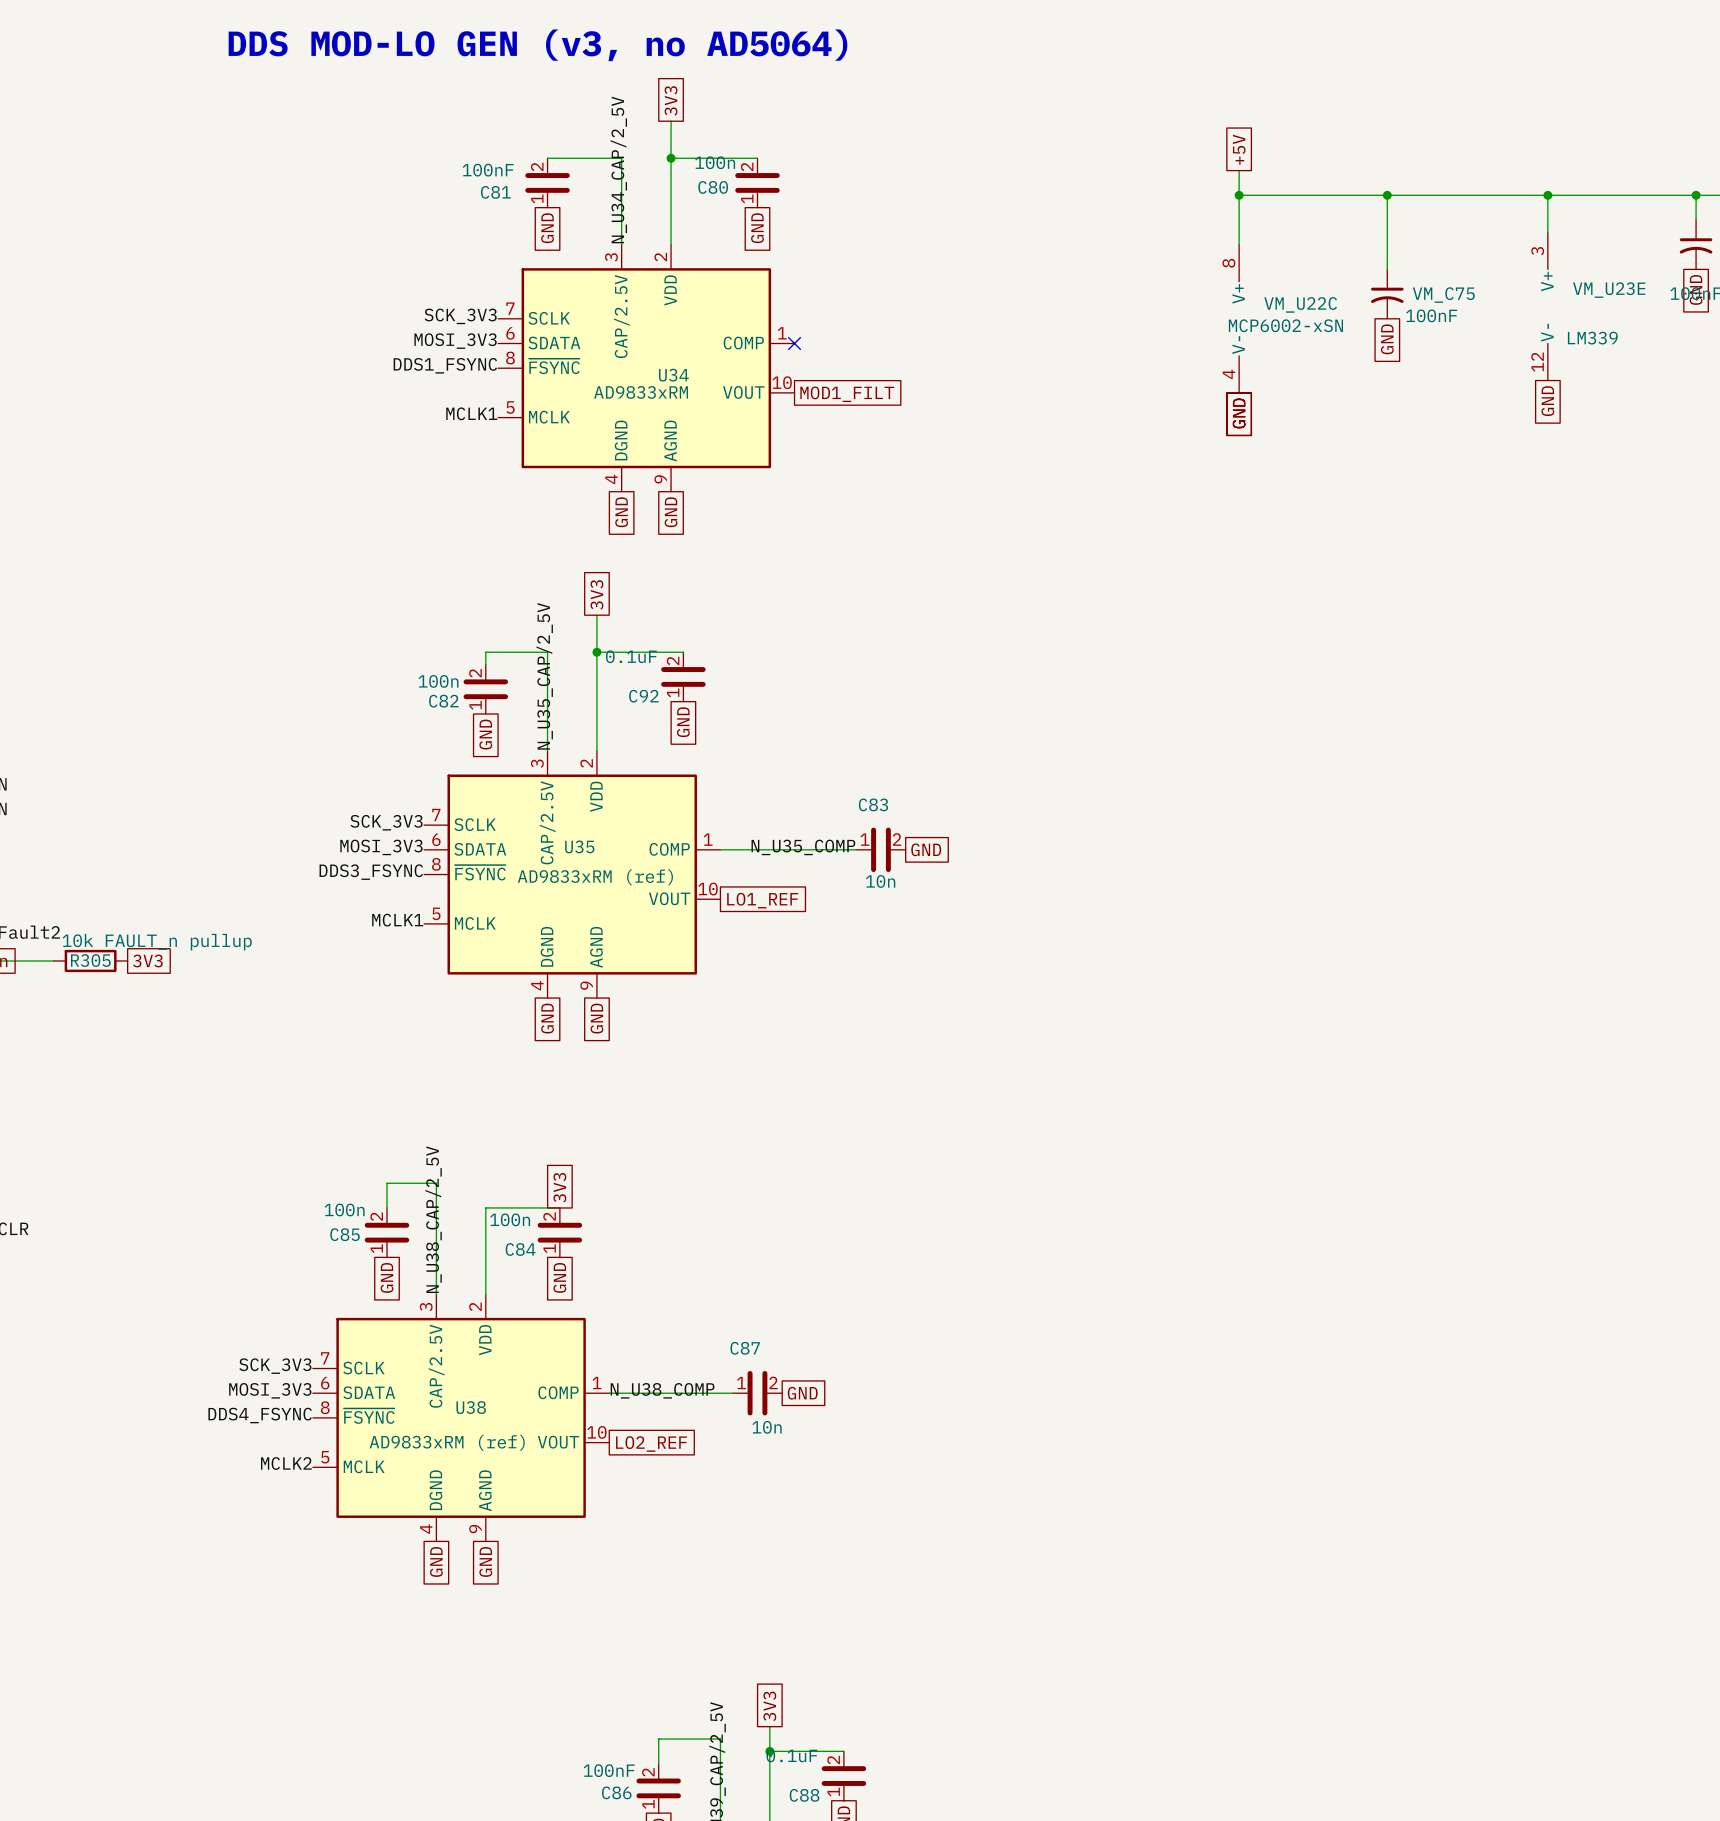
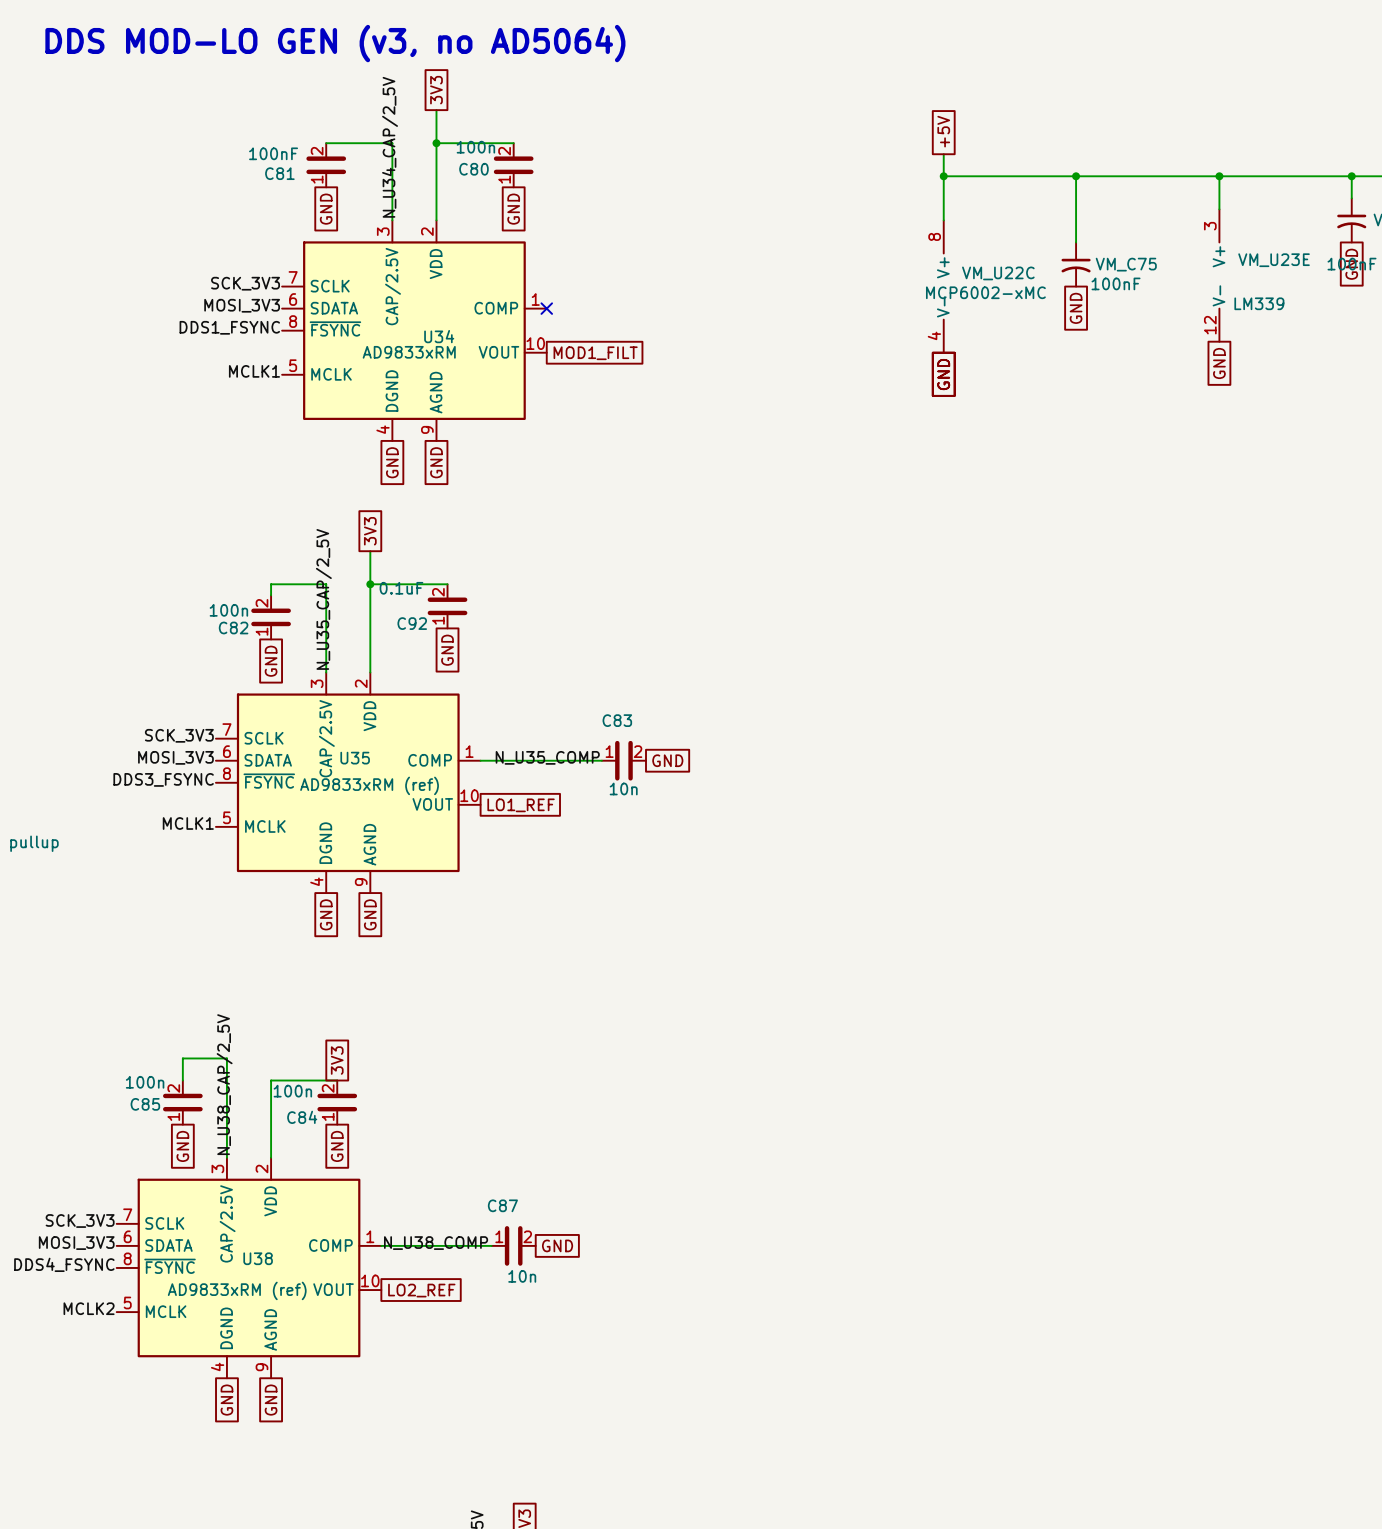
VM_U22C value: MCP6002-xSN (1285, 325) -> MCP6002-xMC (985, 292)

